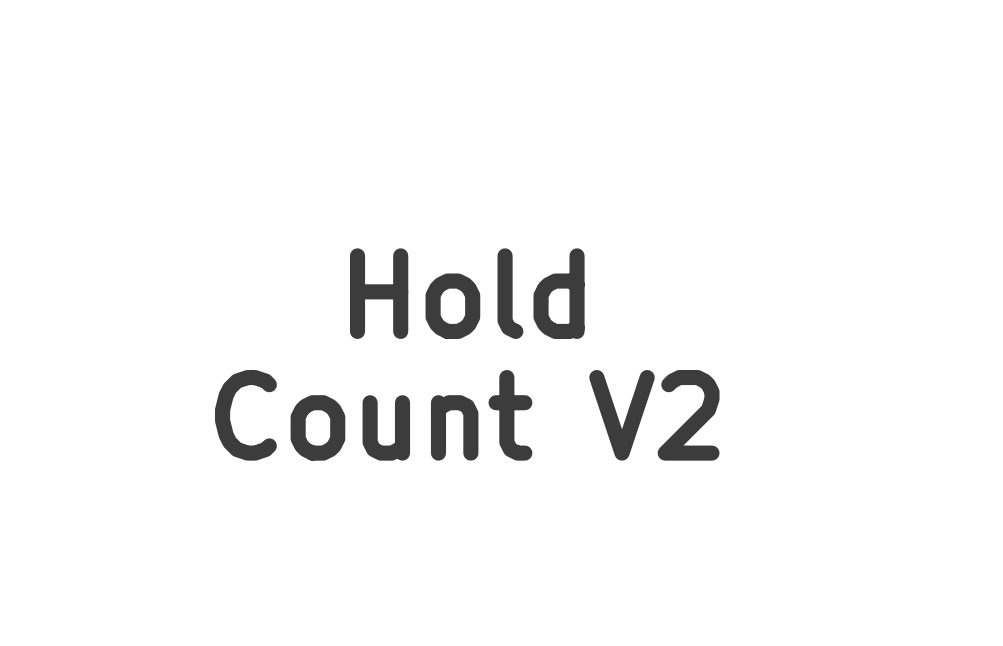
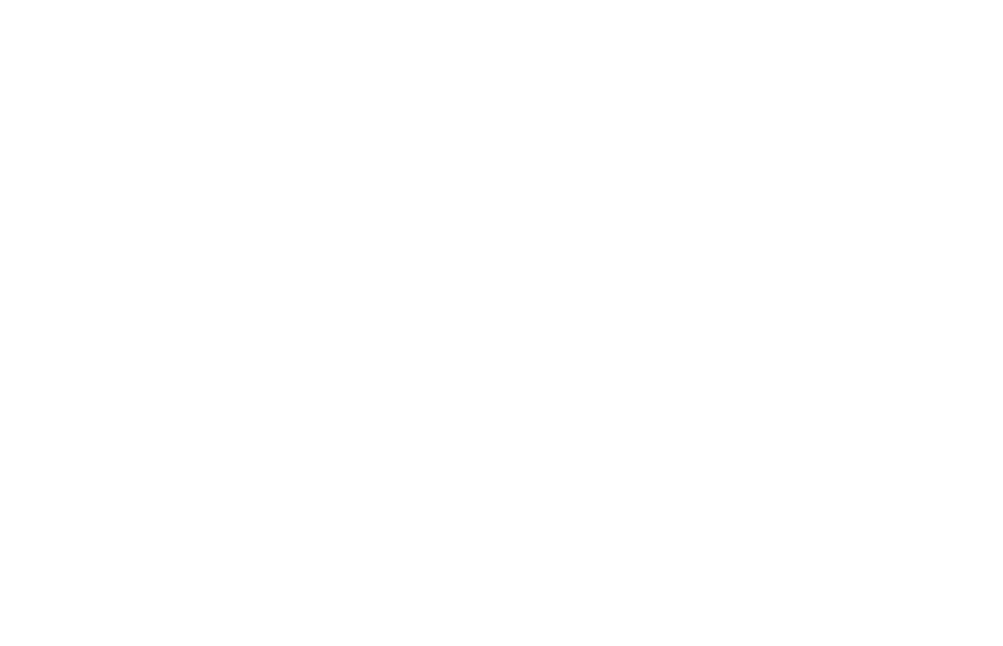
text: Hold (467, 293) -> none
text: Count V2 (467, 415) -> none

